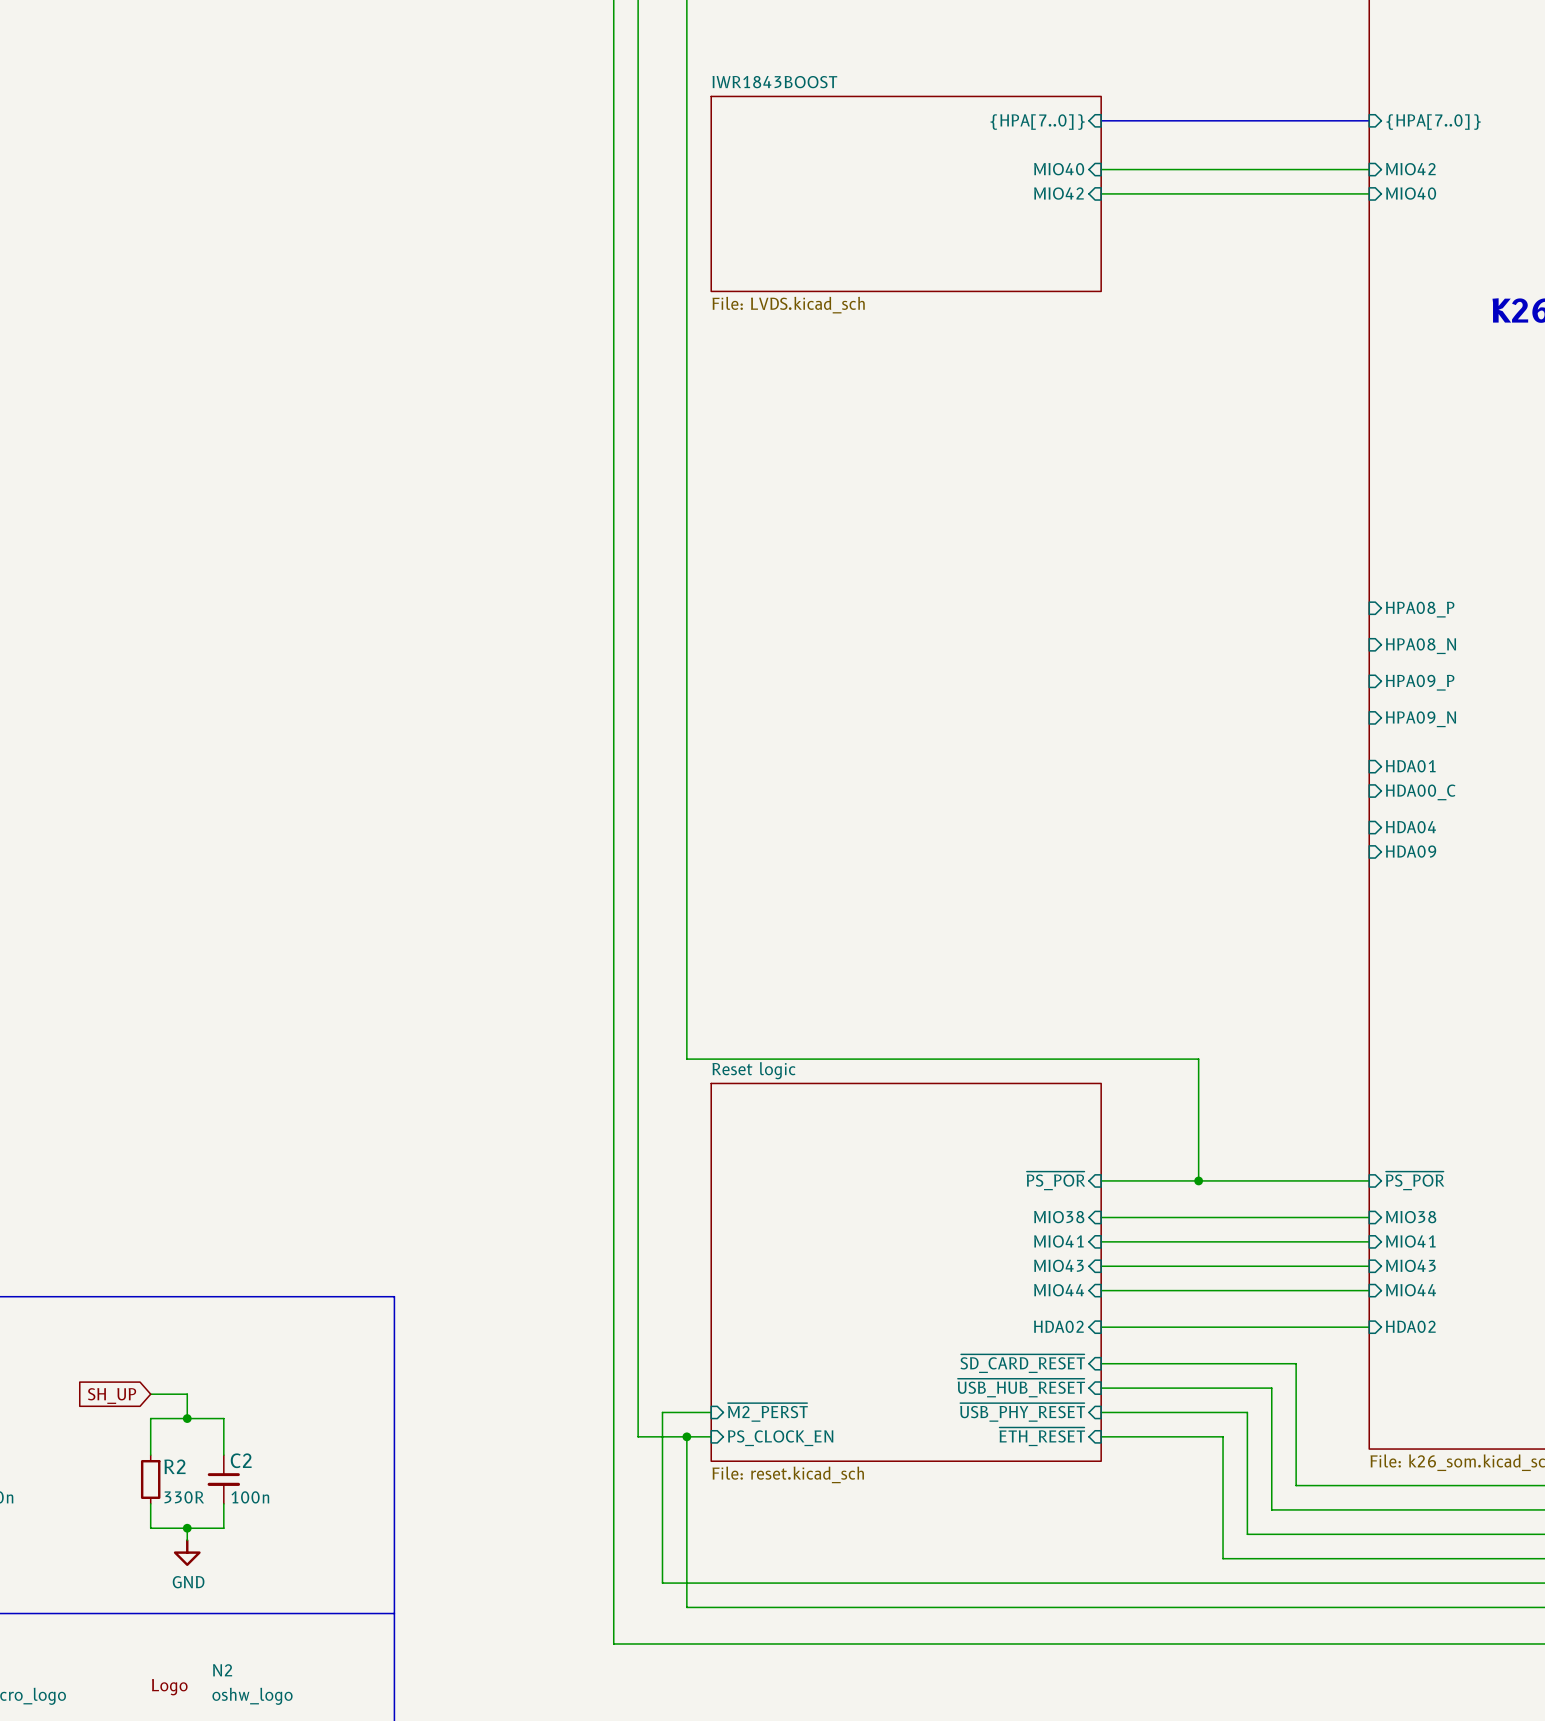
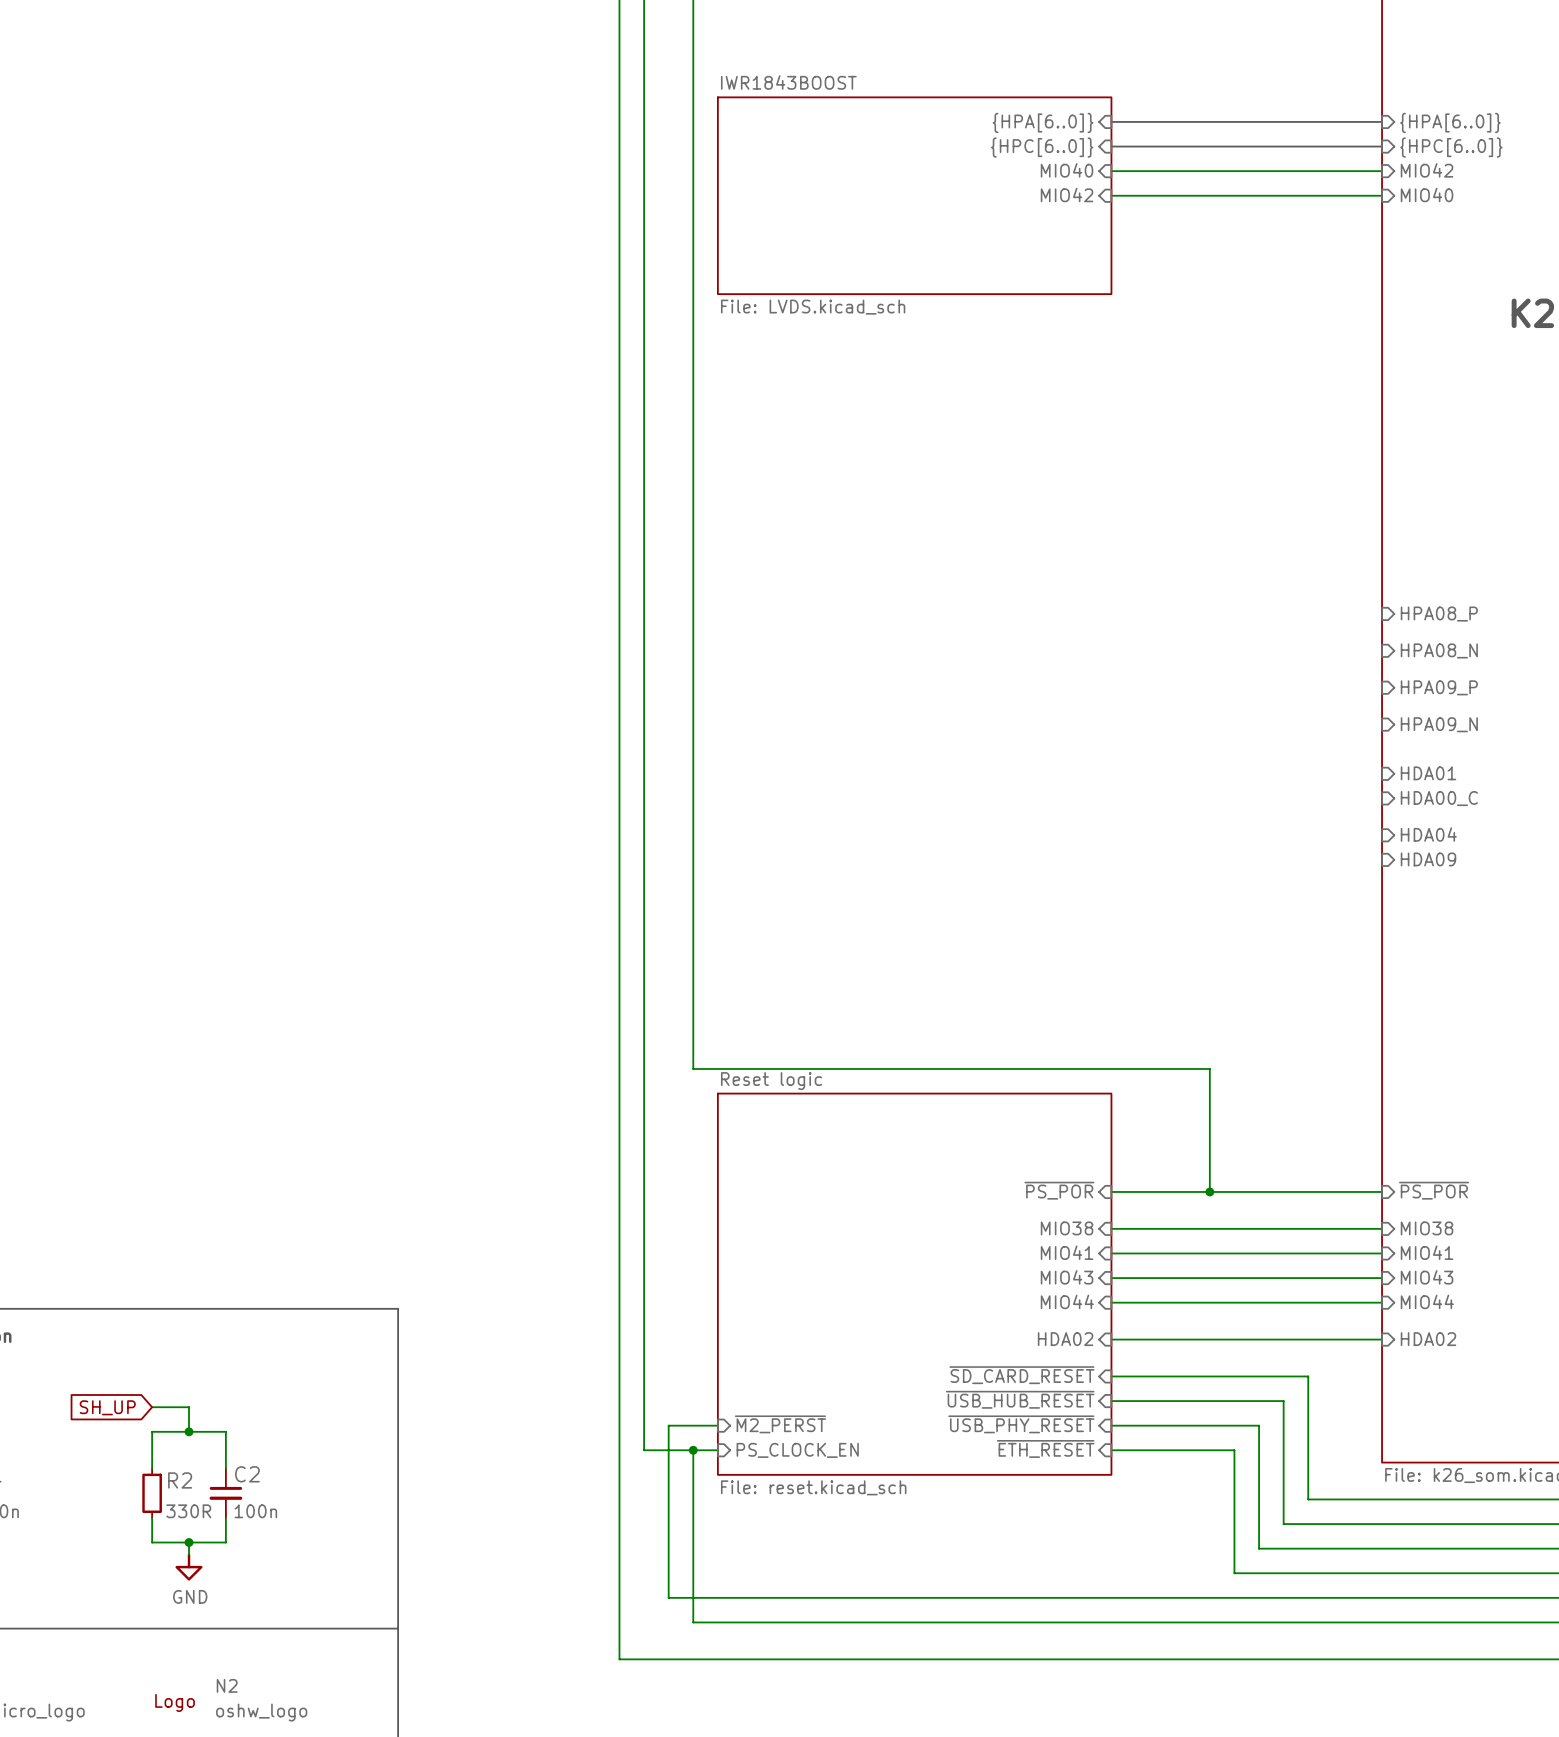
sheet pin: {HPA[7..0]} (1037, 122) -> {HPA[6..0]} (1043, 122)
sheet pin: {HPA[7..0]} (1433, 122) -> {HPA[6..0]} (1450, 122)
bus: none -> (1111, 146) (1382, 146)
sheet pin: none -> {HPC[6..0]} (1042, 147)
sheet pin: none -> {HPC[6..0]} (1451, 147)

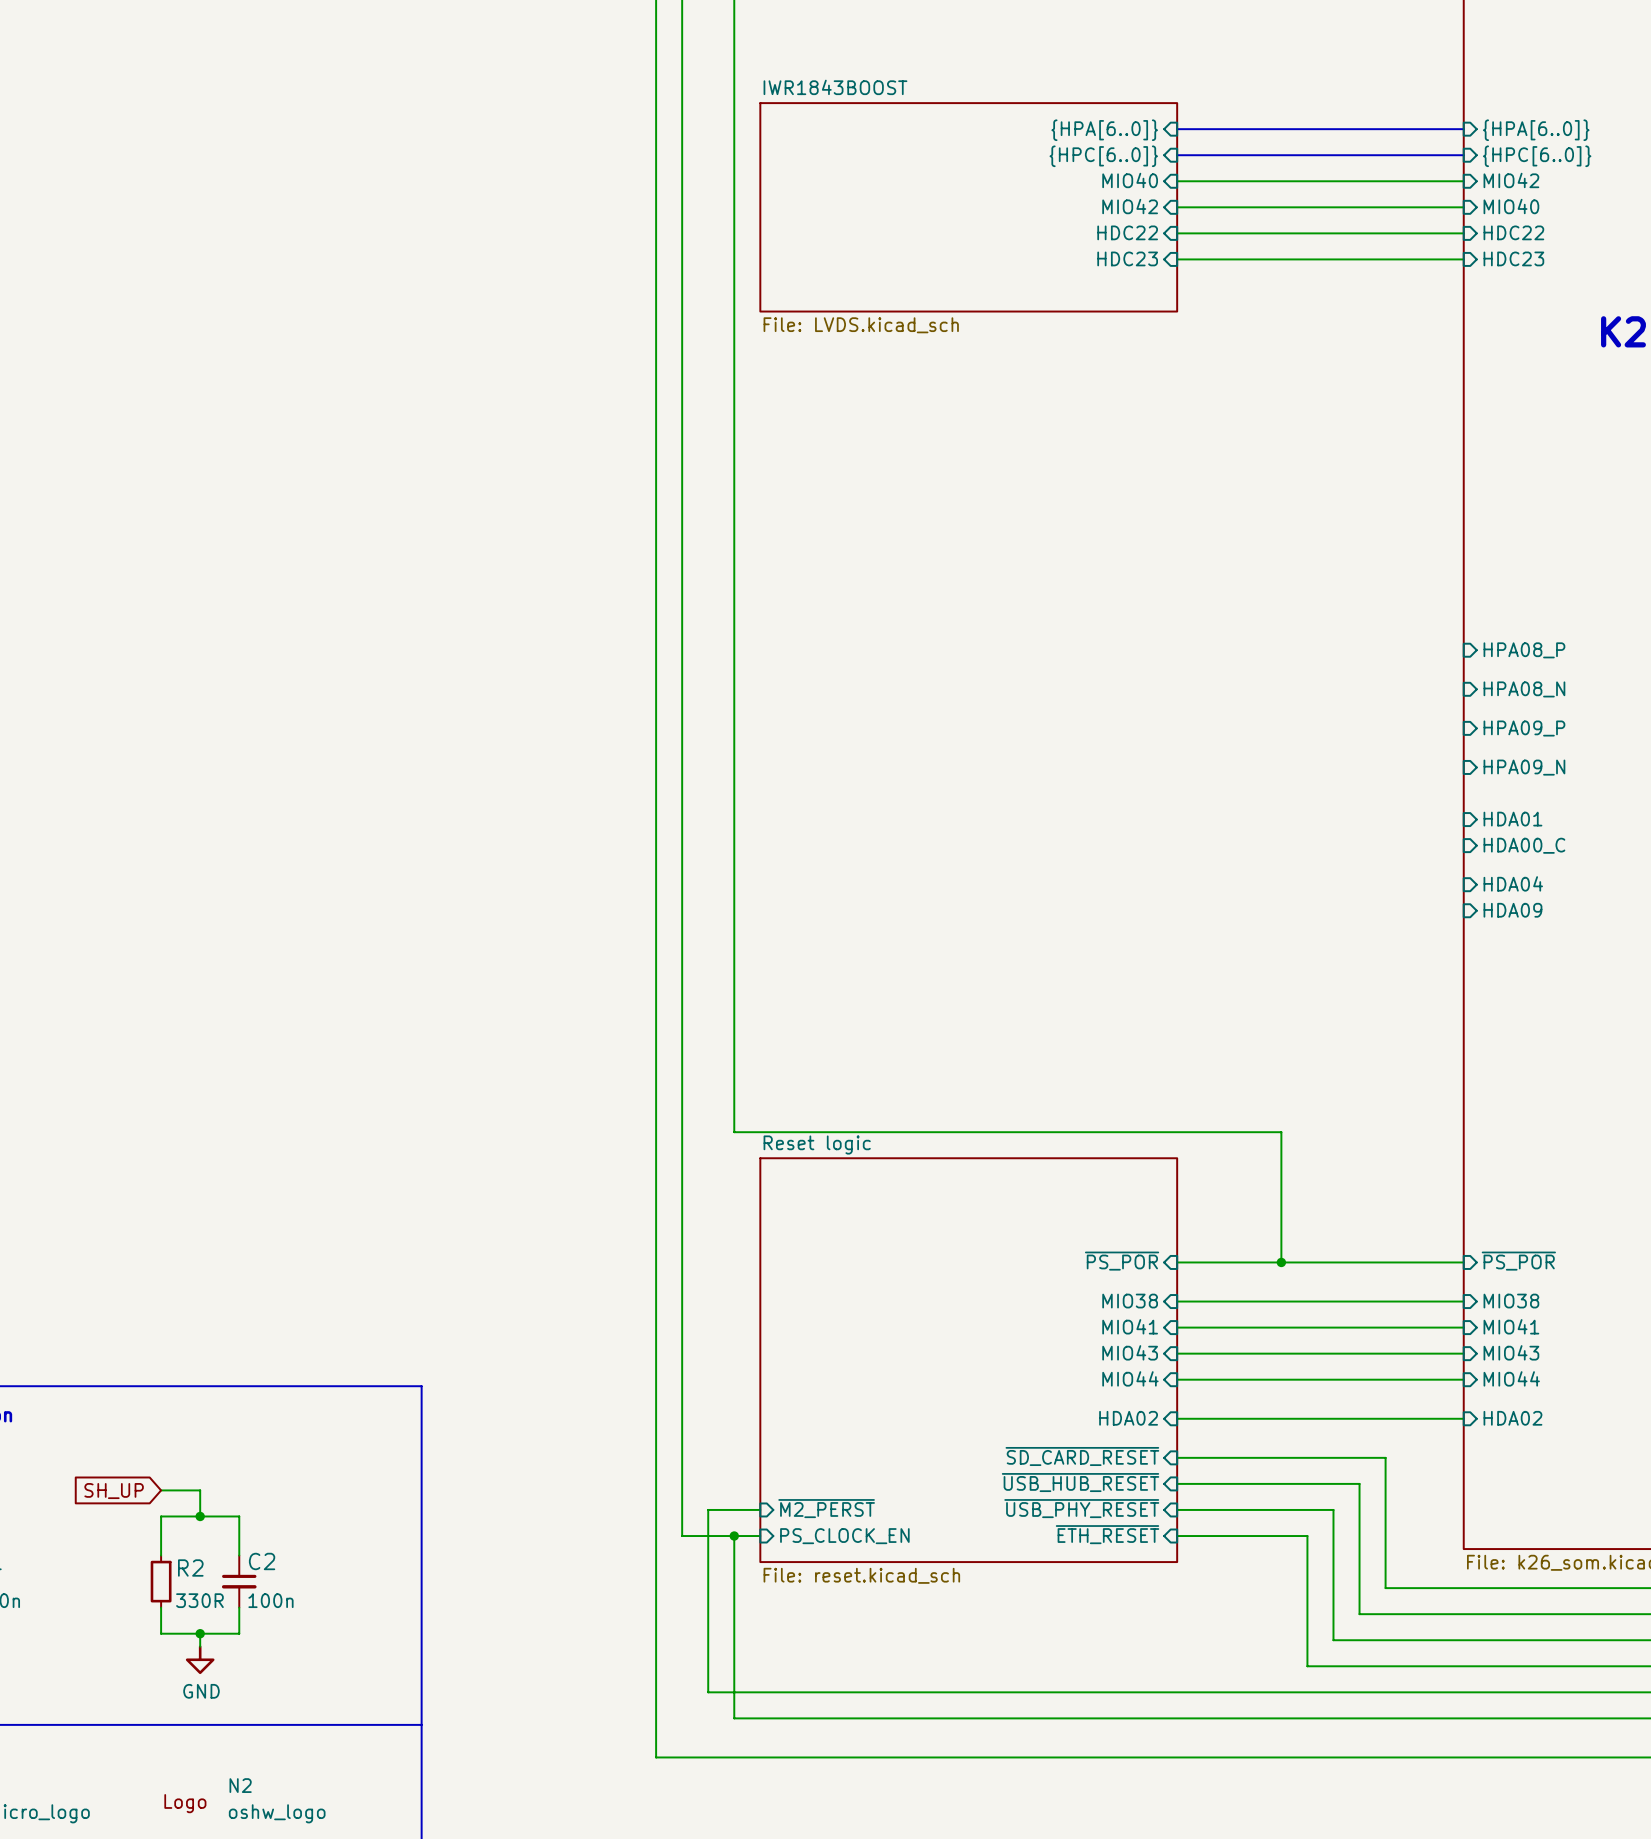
sheet pin: none -> HDC22 (1127, 232)
sheet pin: none -> HDC22 (1513, 232)
wire: none -> (1177, 233) (1463, 233)
sheet pin: none -> HDC23 (1127, 258)
wire: none -> (1177, 259) (1463, 259)
sheet pin: none -> HDC23 (1513, 258)

